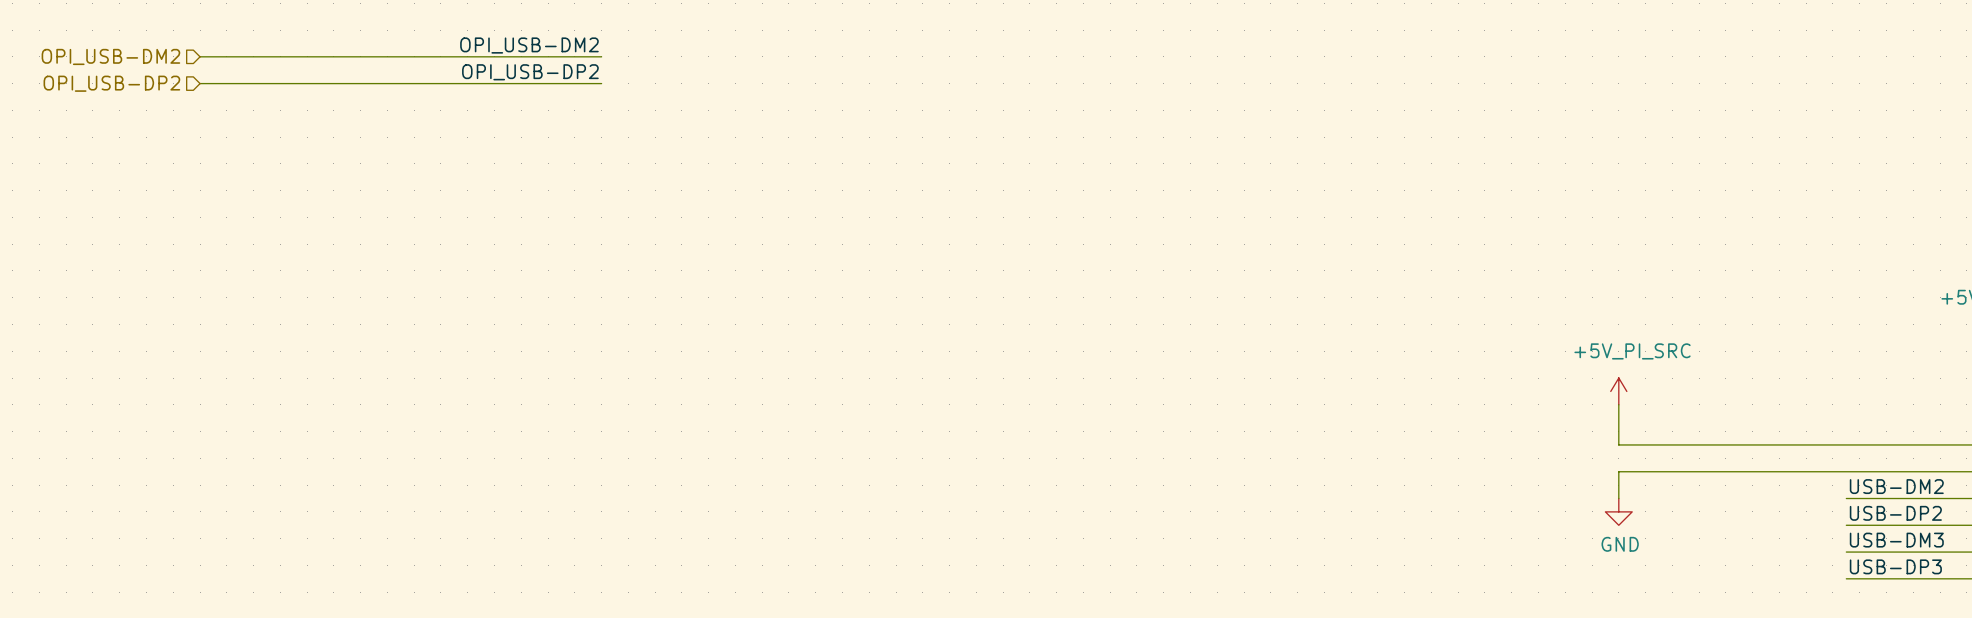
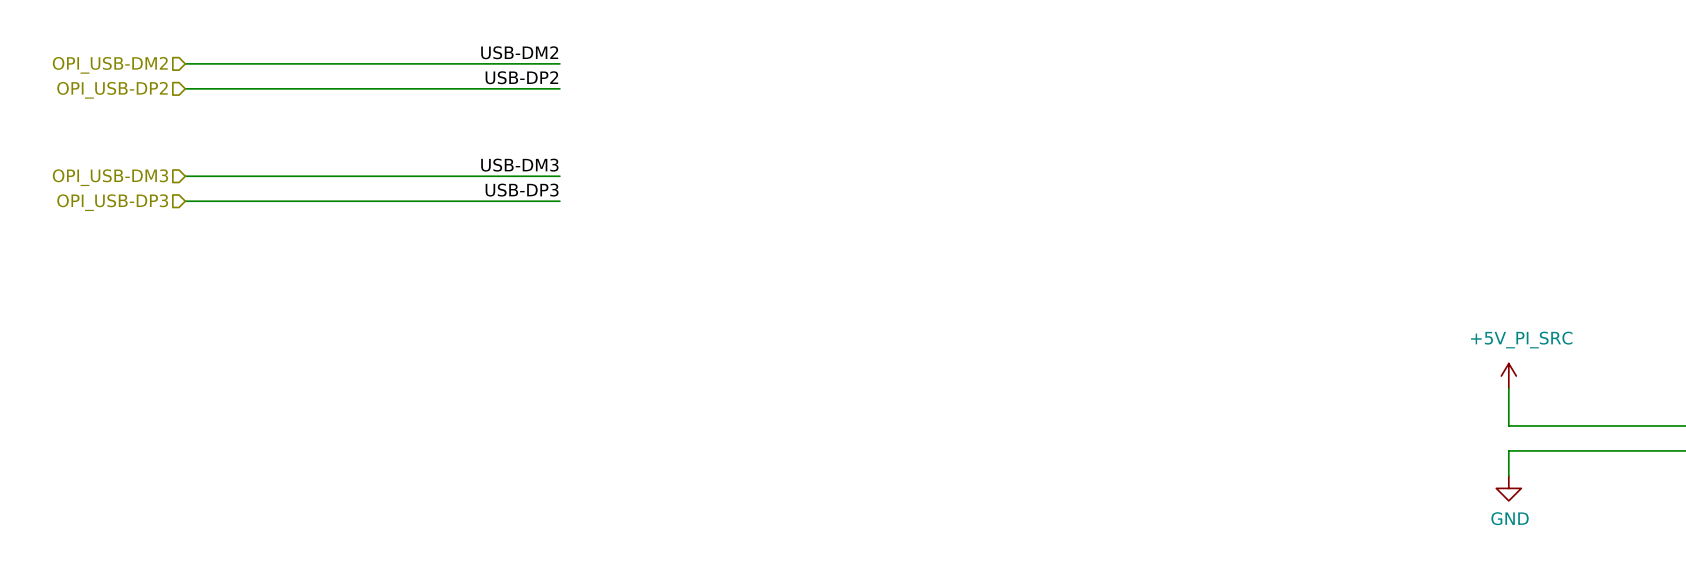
label: OPI_USB-DM2 (529, 45) -> USB-DM2 (519, 52)
label: OPI_USB-DP2 (530, 72) -> USB-DP2 (521, 77)
label: none -> USB-DM3 (519, 165)
hierarchical label: none -> OPI_USB-DM3 (110, 177)
wire: none -> (185, 176) (559, 176)
label: none -> USB-DP3 (522, 190)
hierarchical label: none -> OPI_USB-DP3 (112, 202)
wire: none -> (185, 201) (559, 201)

